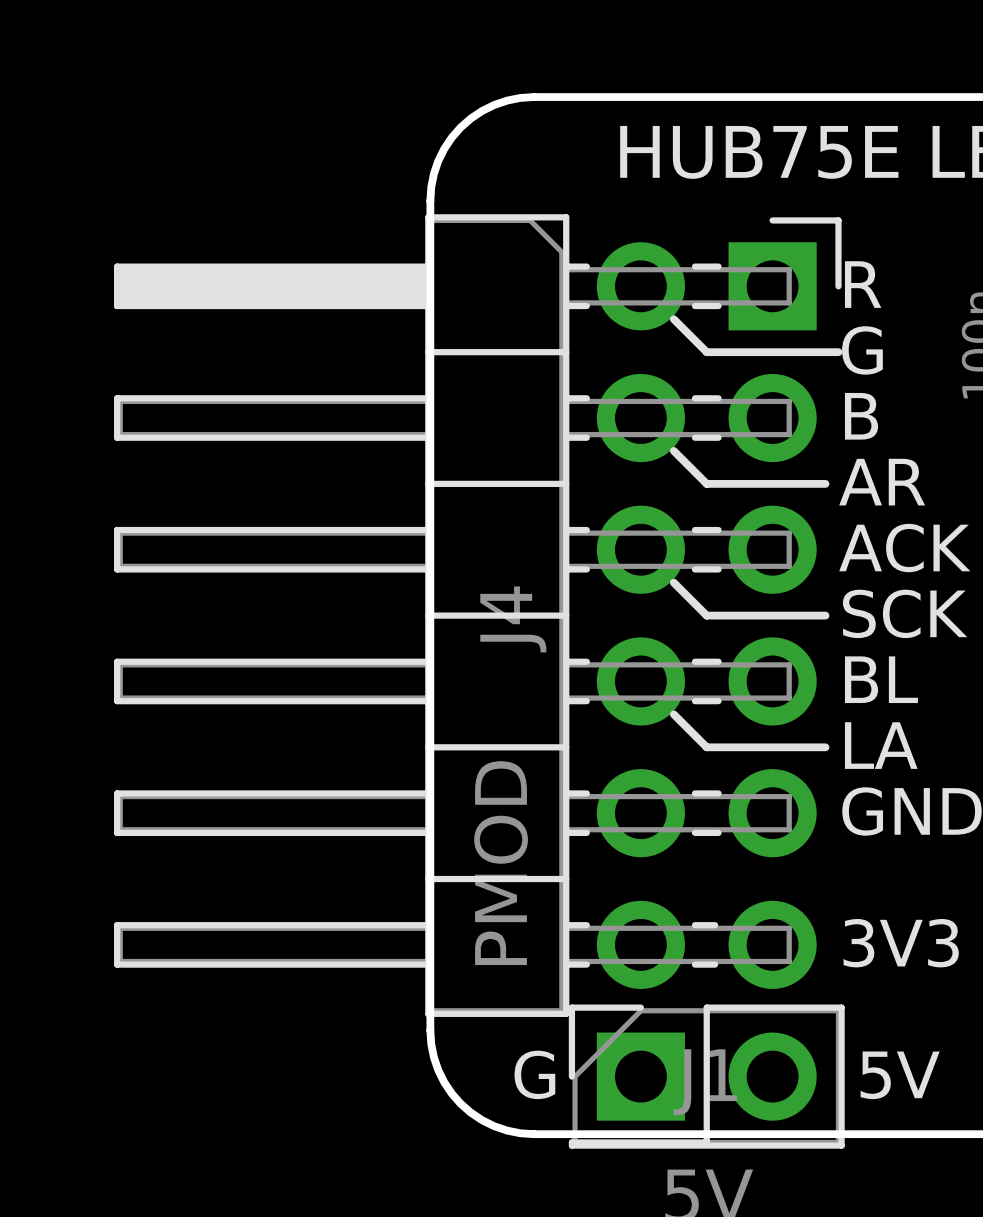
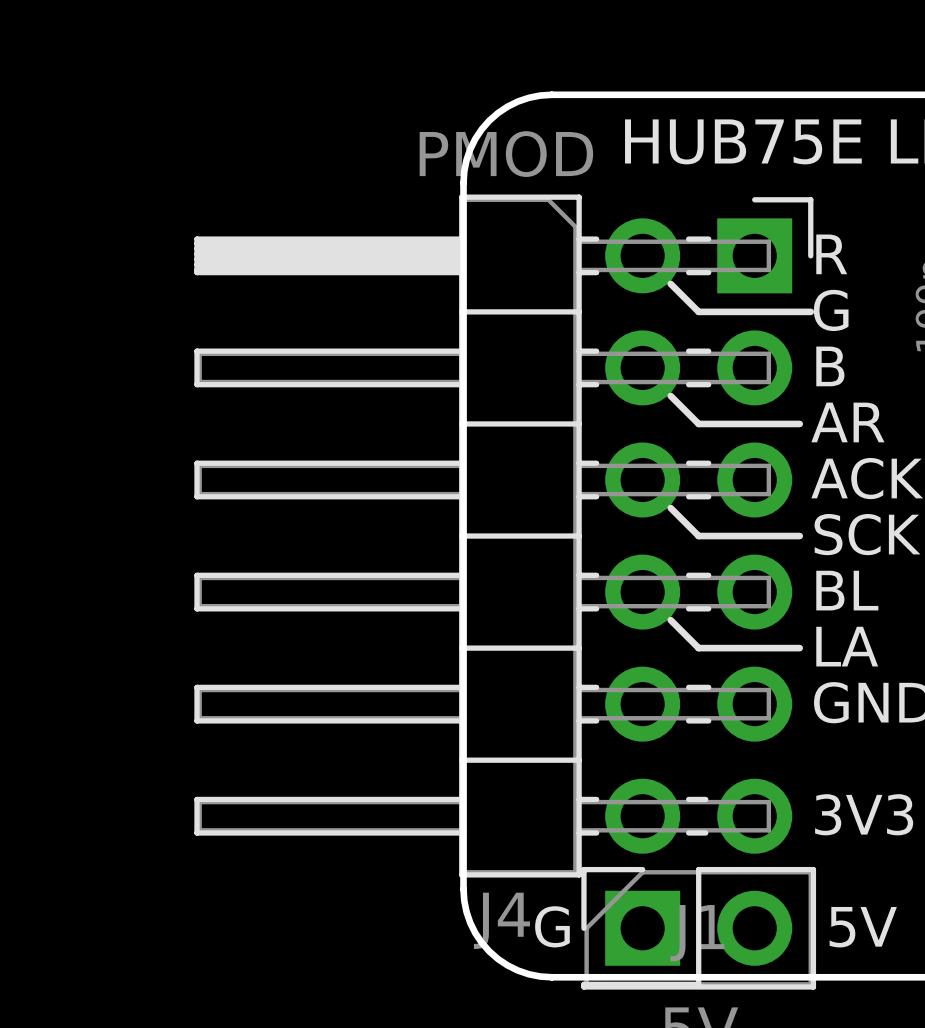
J4 name rotation: 0° (513, 619) -> 90° clockwise (501, 920)
J4 name position: J4 (513, 619) -> J4 (501, 920)
J4 value rotation: 0° (501, 863) -> 90° clockwise (506, 154)
J4 value position: PMOD (501, 863) -> PMOD (506, 154)

